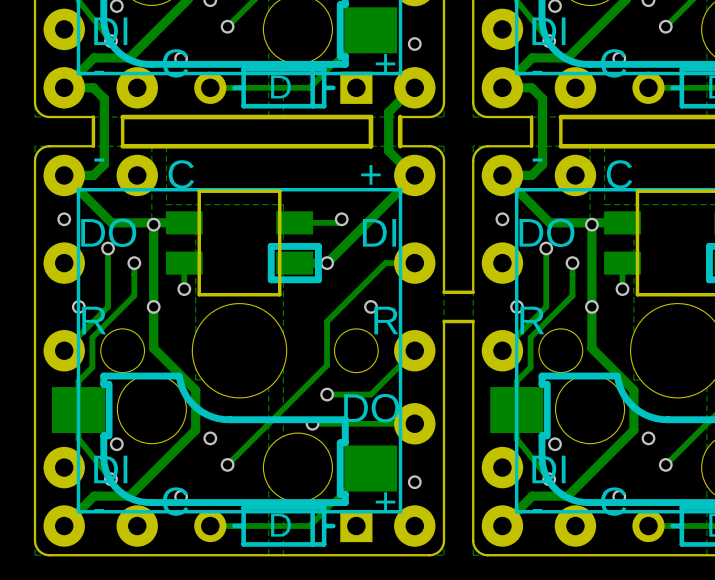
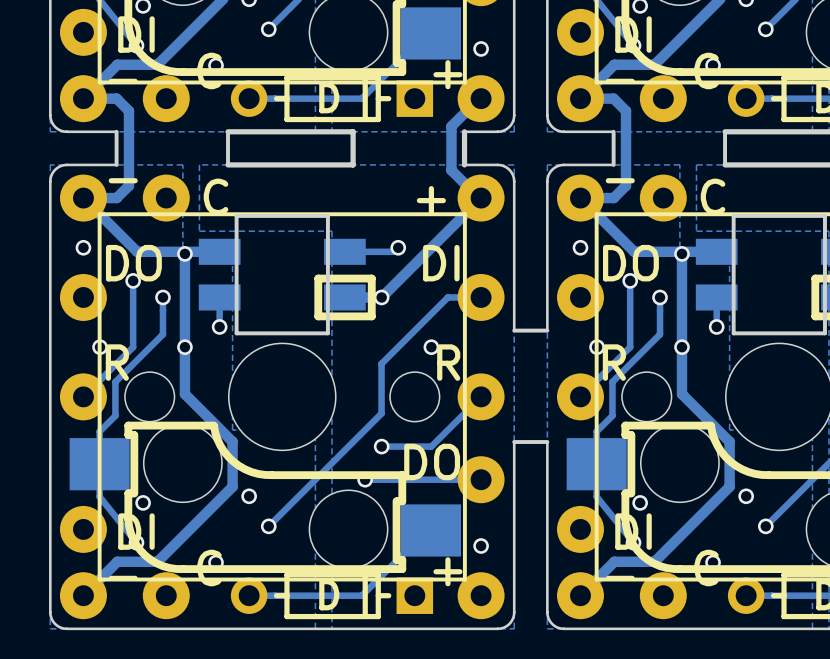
board edge: (191, 117) (122, 117) (122, 146) (191, 146) -> (228, 131) (228, 164)
board edge: (301, 117) (370, 117) (370, 146) (301, 146) -> (353, 131) (353, 164)
board edge: (629, 117) (560, 117) (560, 146) (629, 146) -> (725, 131) (725, 164)
board edge: (473, 390) (473, 321) (444, 321) (444, 390) -> (547, 442) (514, 442)

